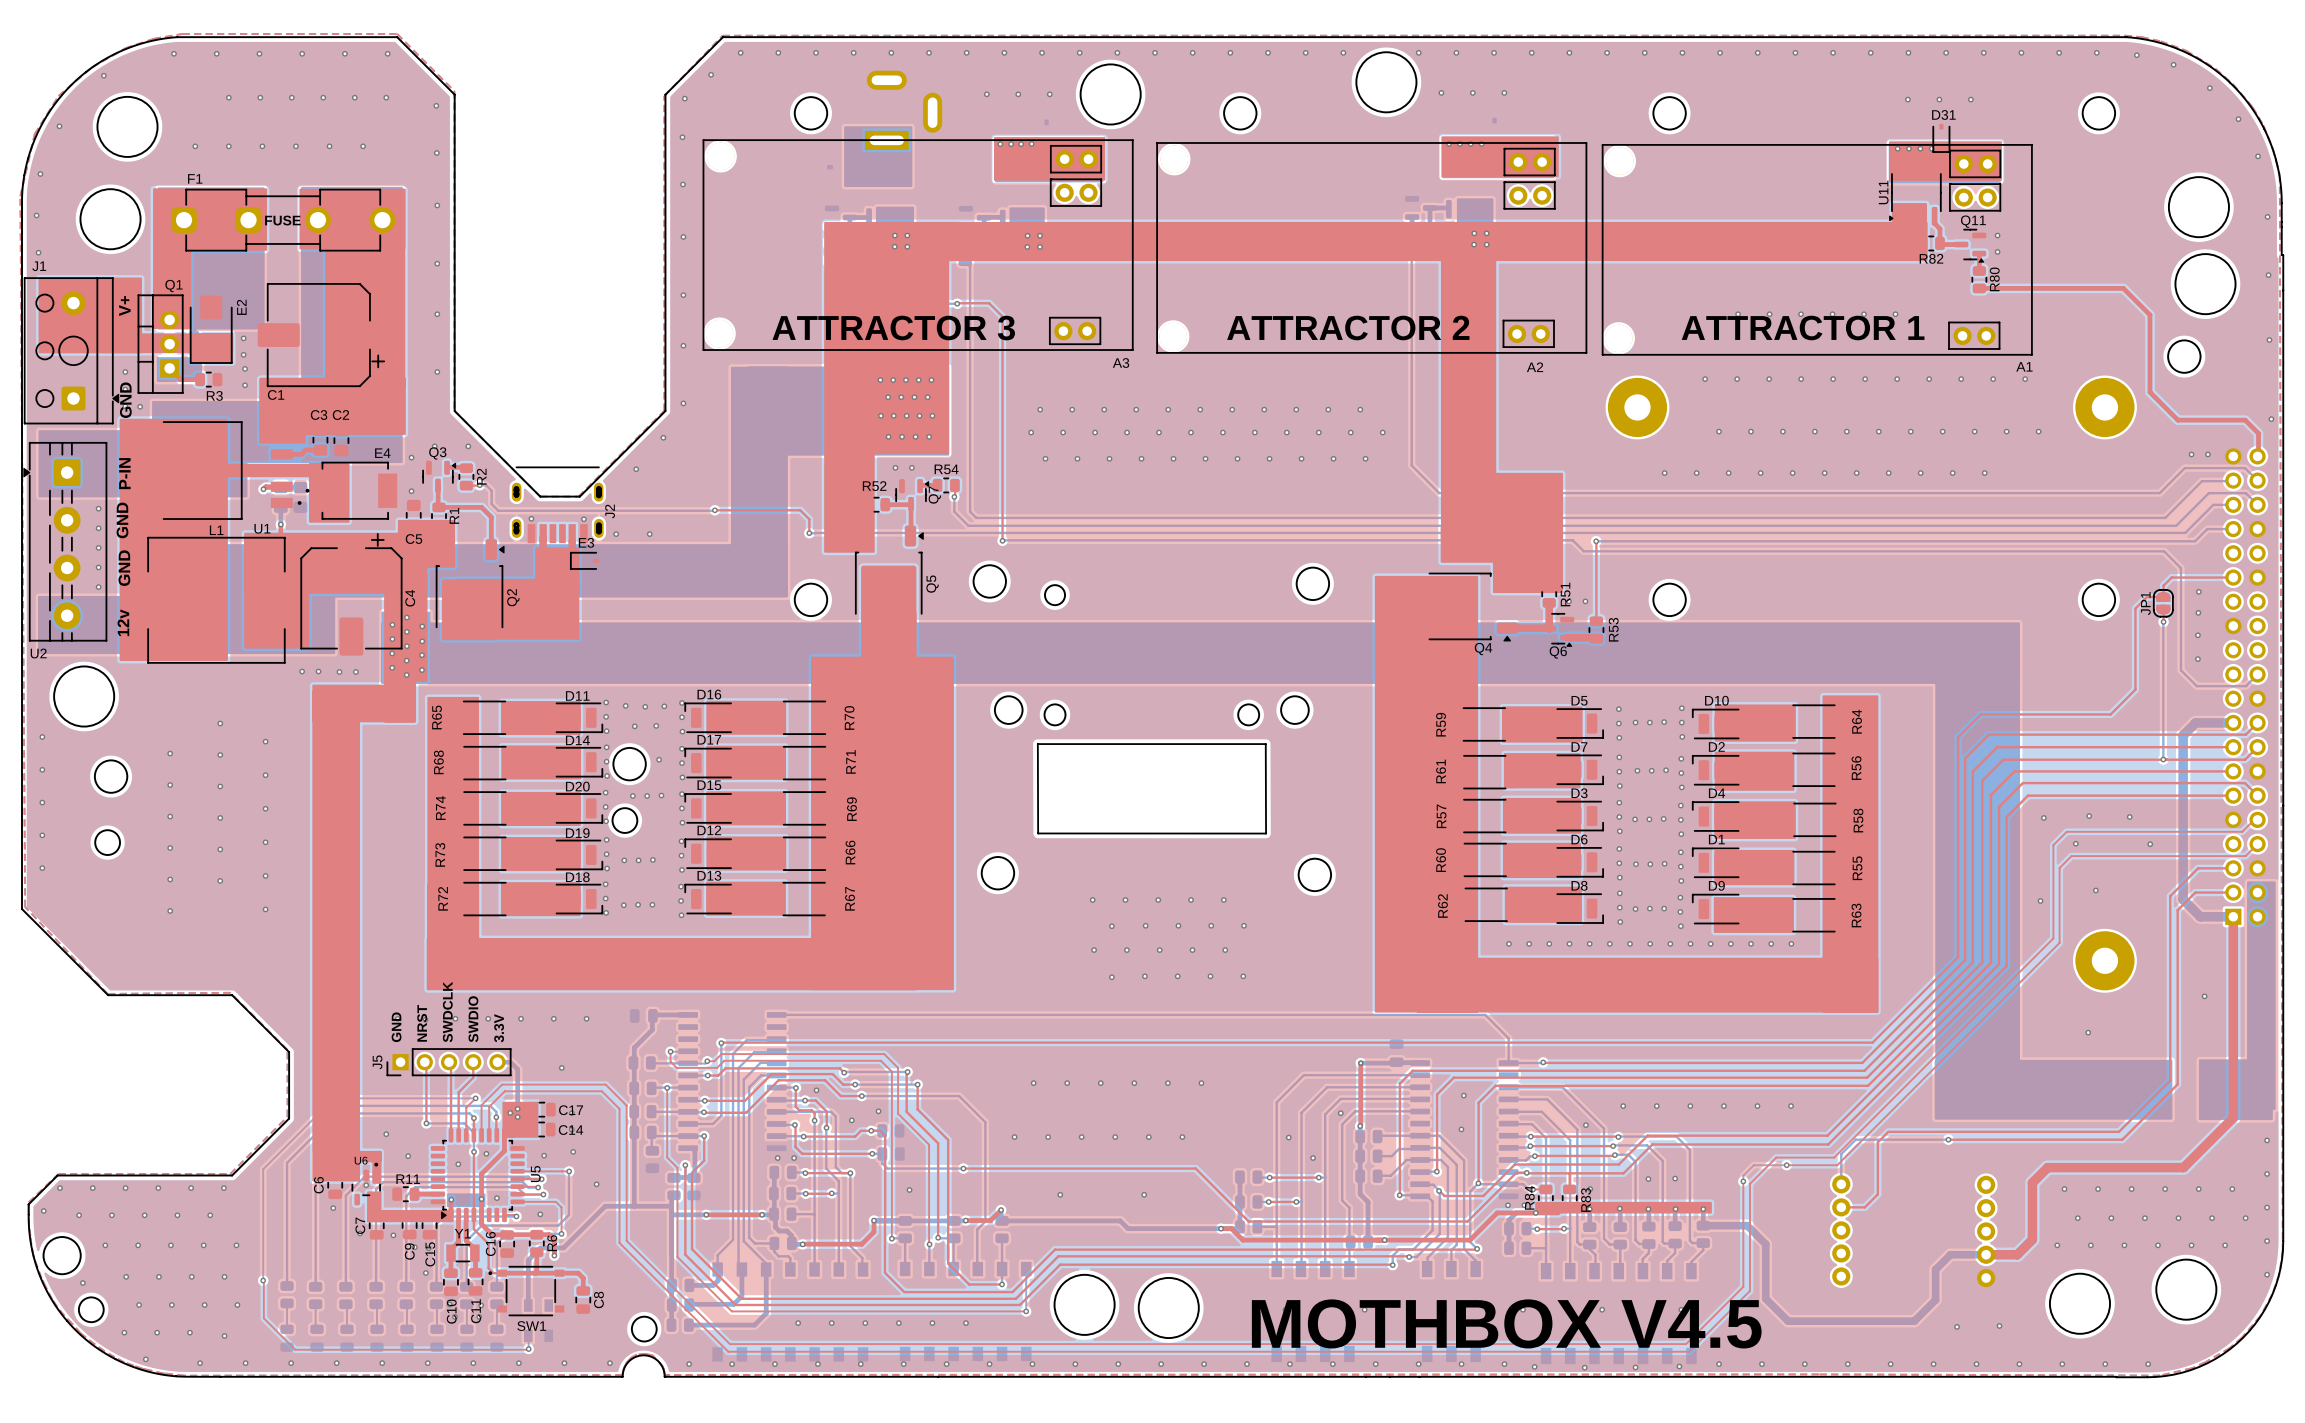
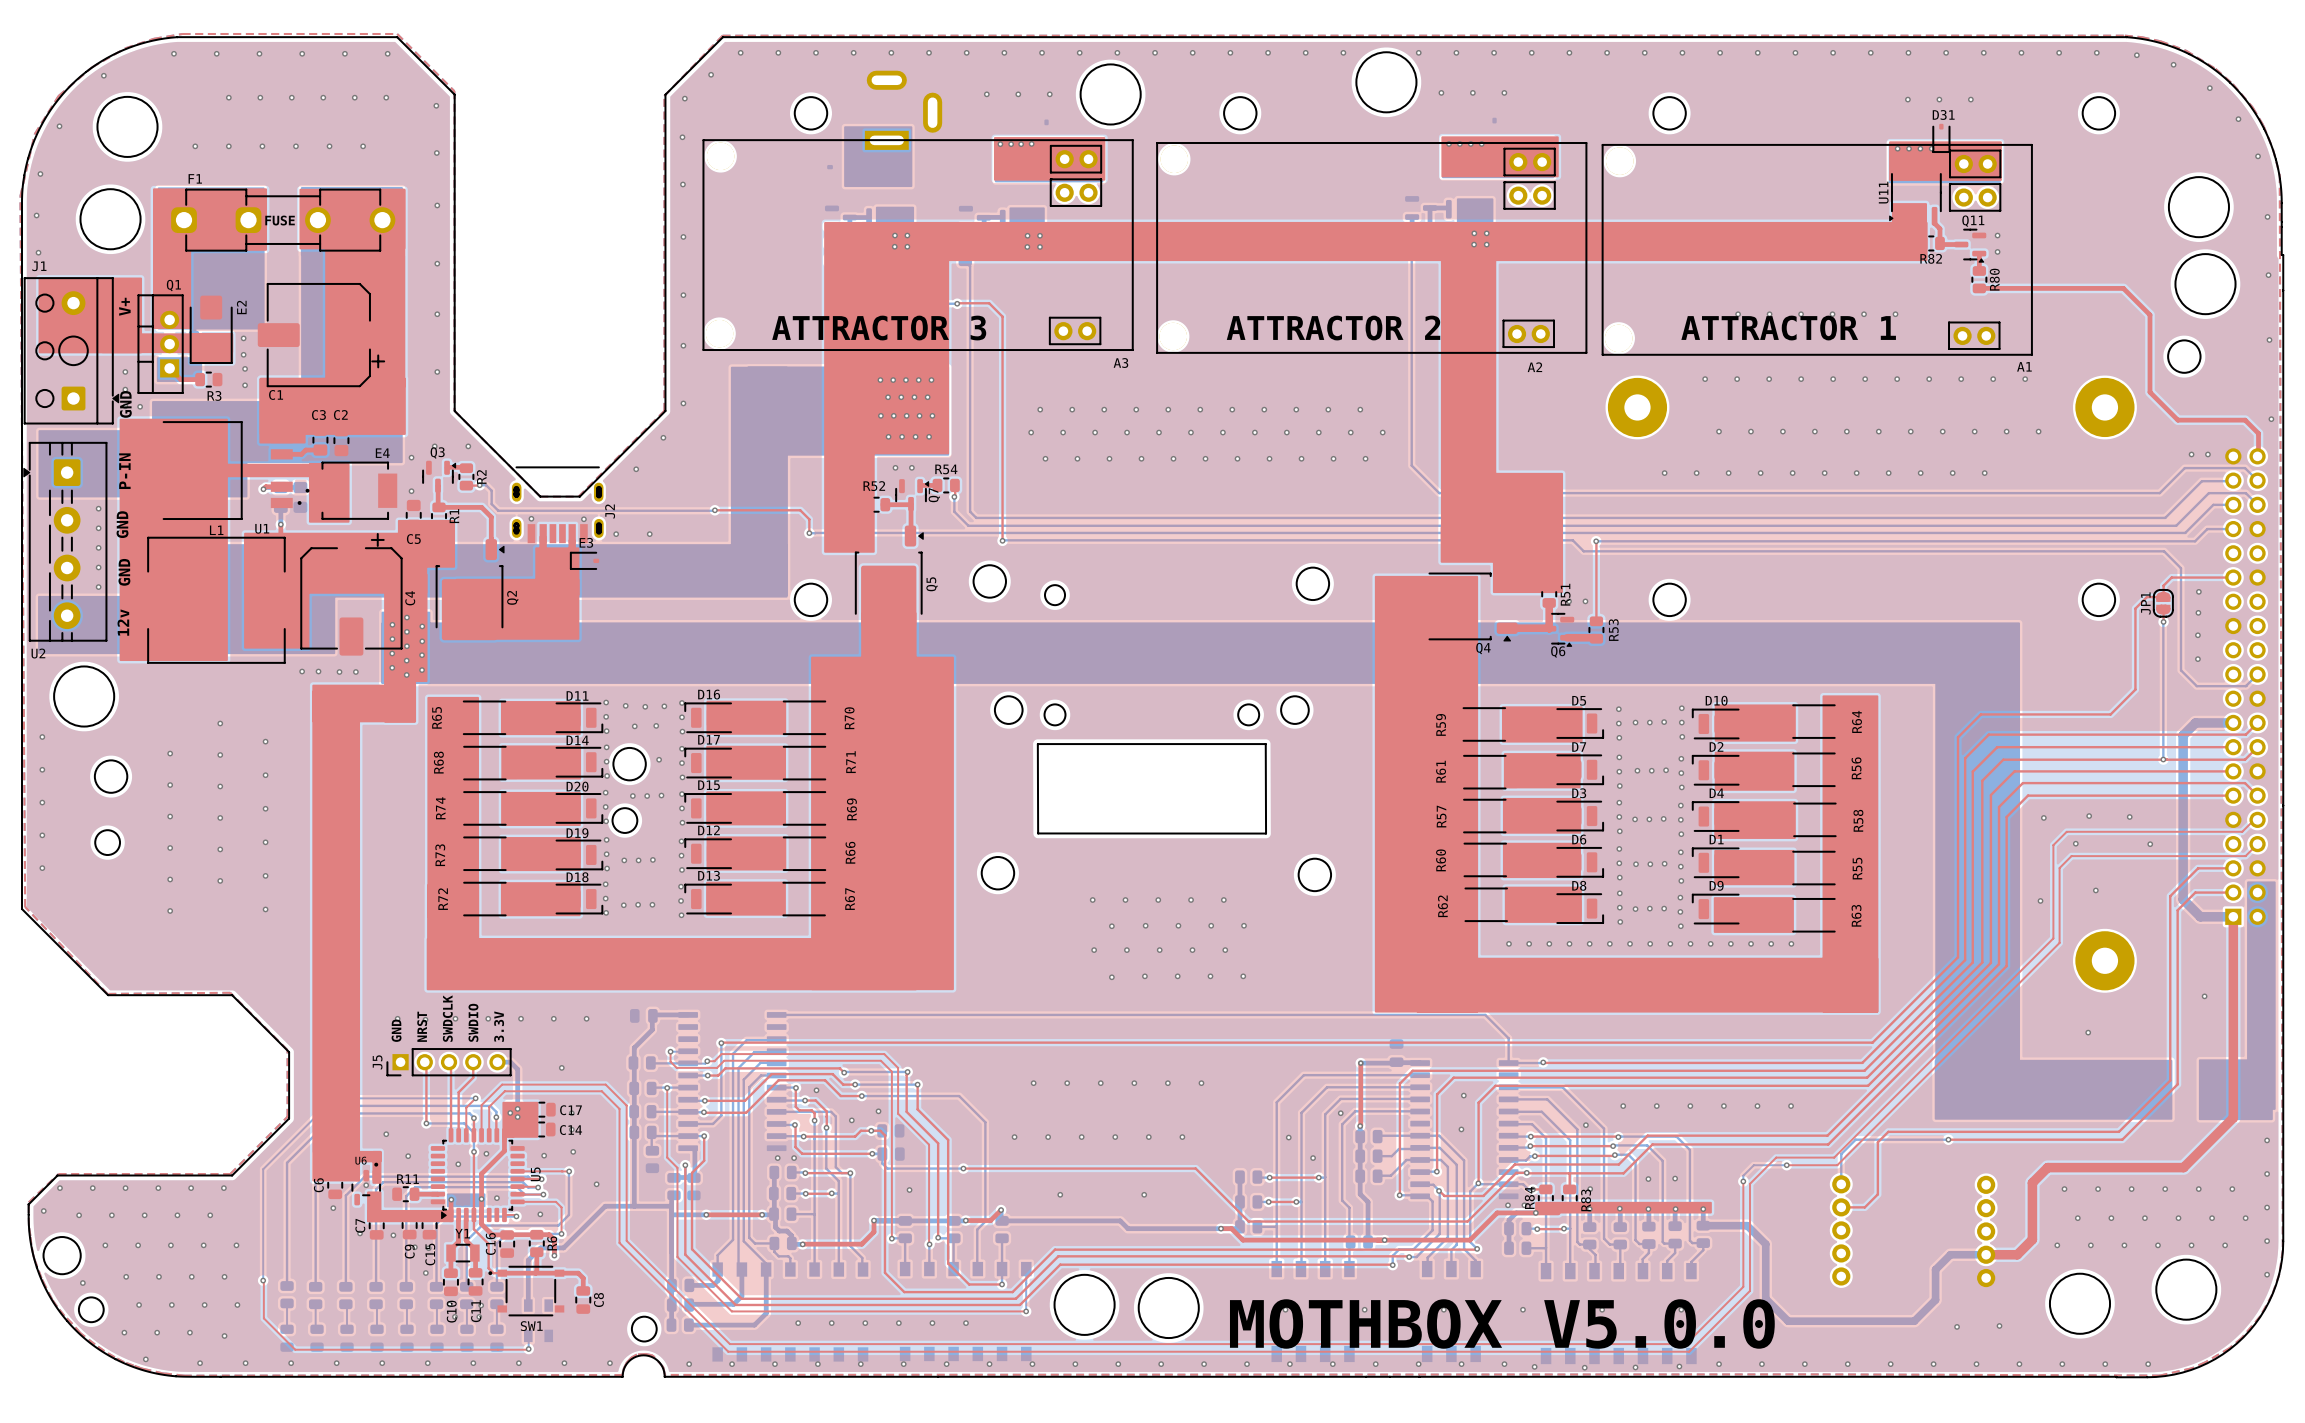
text: MOTHBOX V4.5 (1506, 1323) -> MOTHBOX V5.0.0 (1502, 1323)

